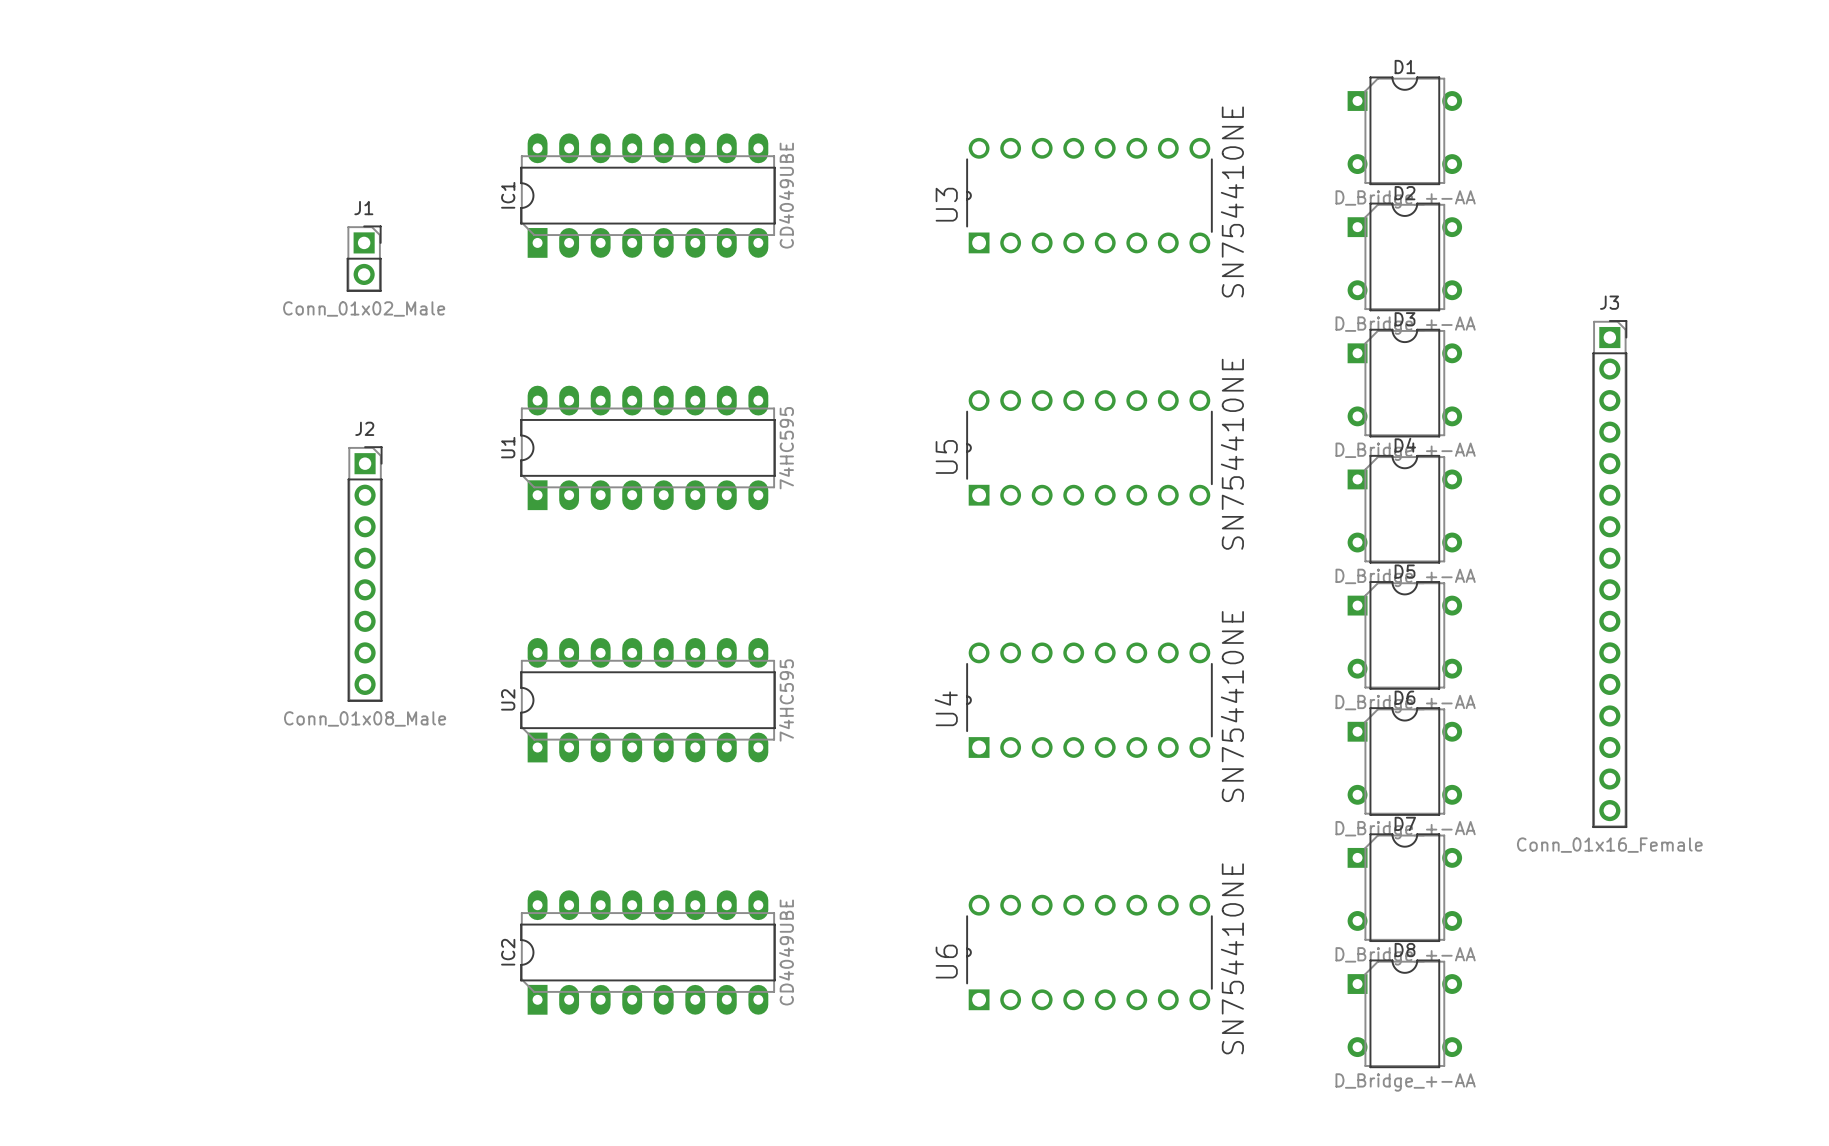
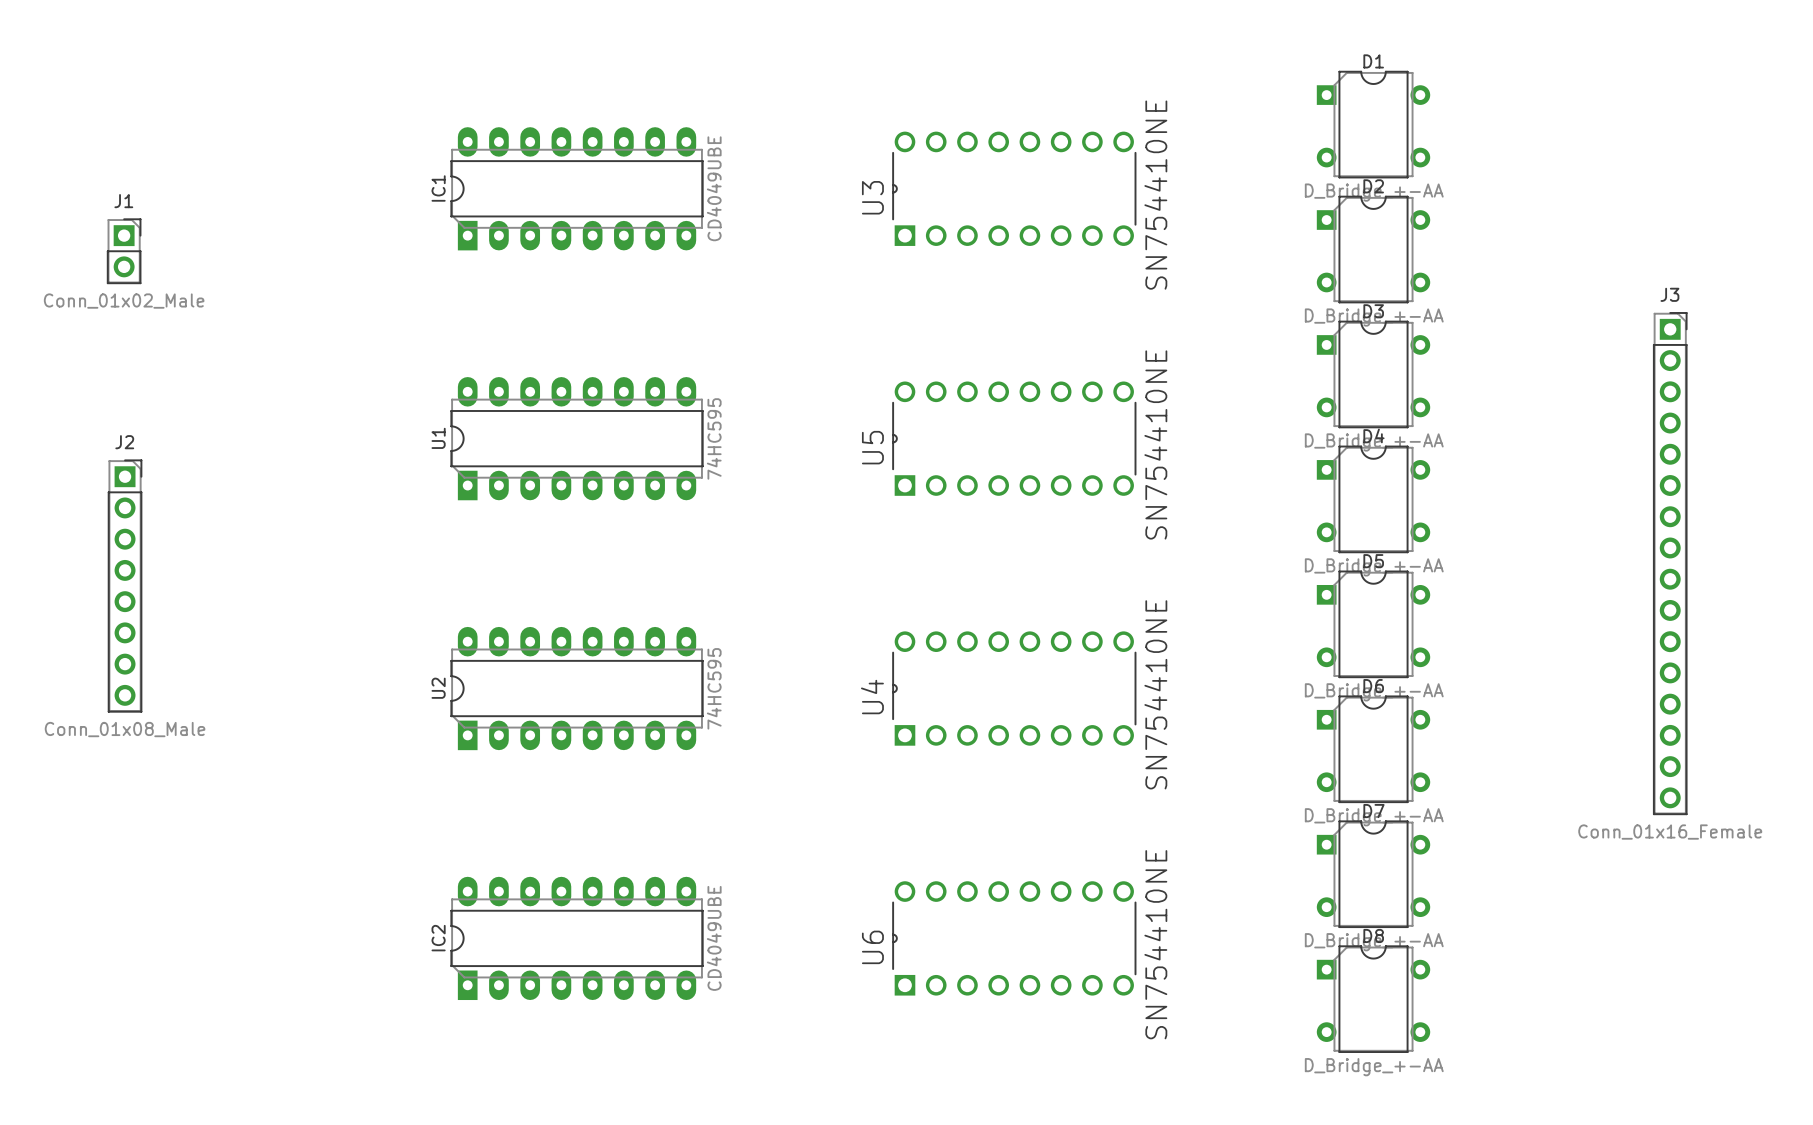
U3 footprint: [966, 137, 1213, 254] -> [892, 131, 1137, 246]
IC1 position: (647, 195) -> (577, 188)
J1 position: (364, 258) -> (124, 251)
U5 footprint: [966, 390, 1213, 506] -> [892, 381, 1137, 496]
U1 position: (647, 447) -> (577, 438)
J2 position: (365, 574) -> (125, 586)
J3 position: (1609, 574) -> (1670, 563)
U4 footprint: [966, 642, 1213, 758] -> [892, 631, 1137, 746]
U2 position: (647, 700) -> (577, 688)
U6 footprint: [966, 894, 1213, 1011] -> [892, 881, 1137, 996]
IC2 position: (647, 952) -> (577, 938)

